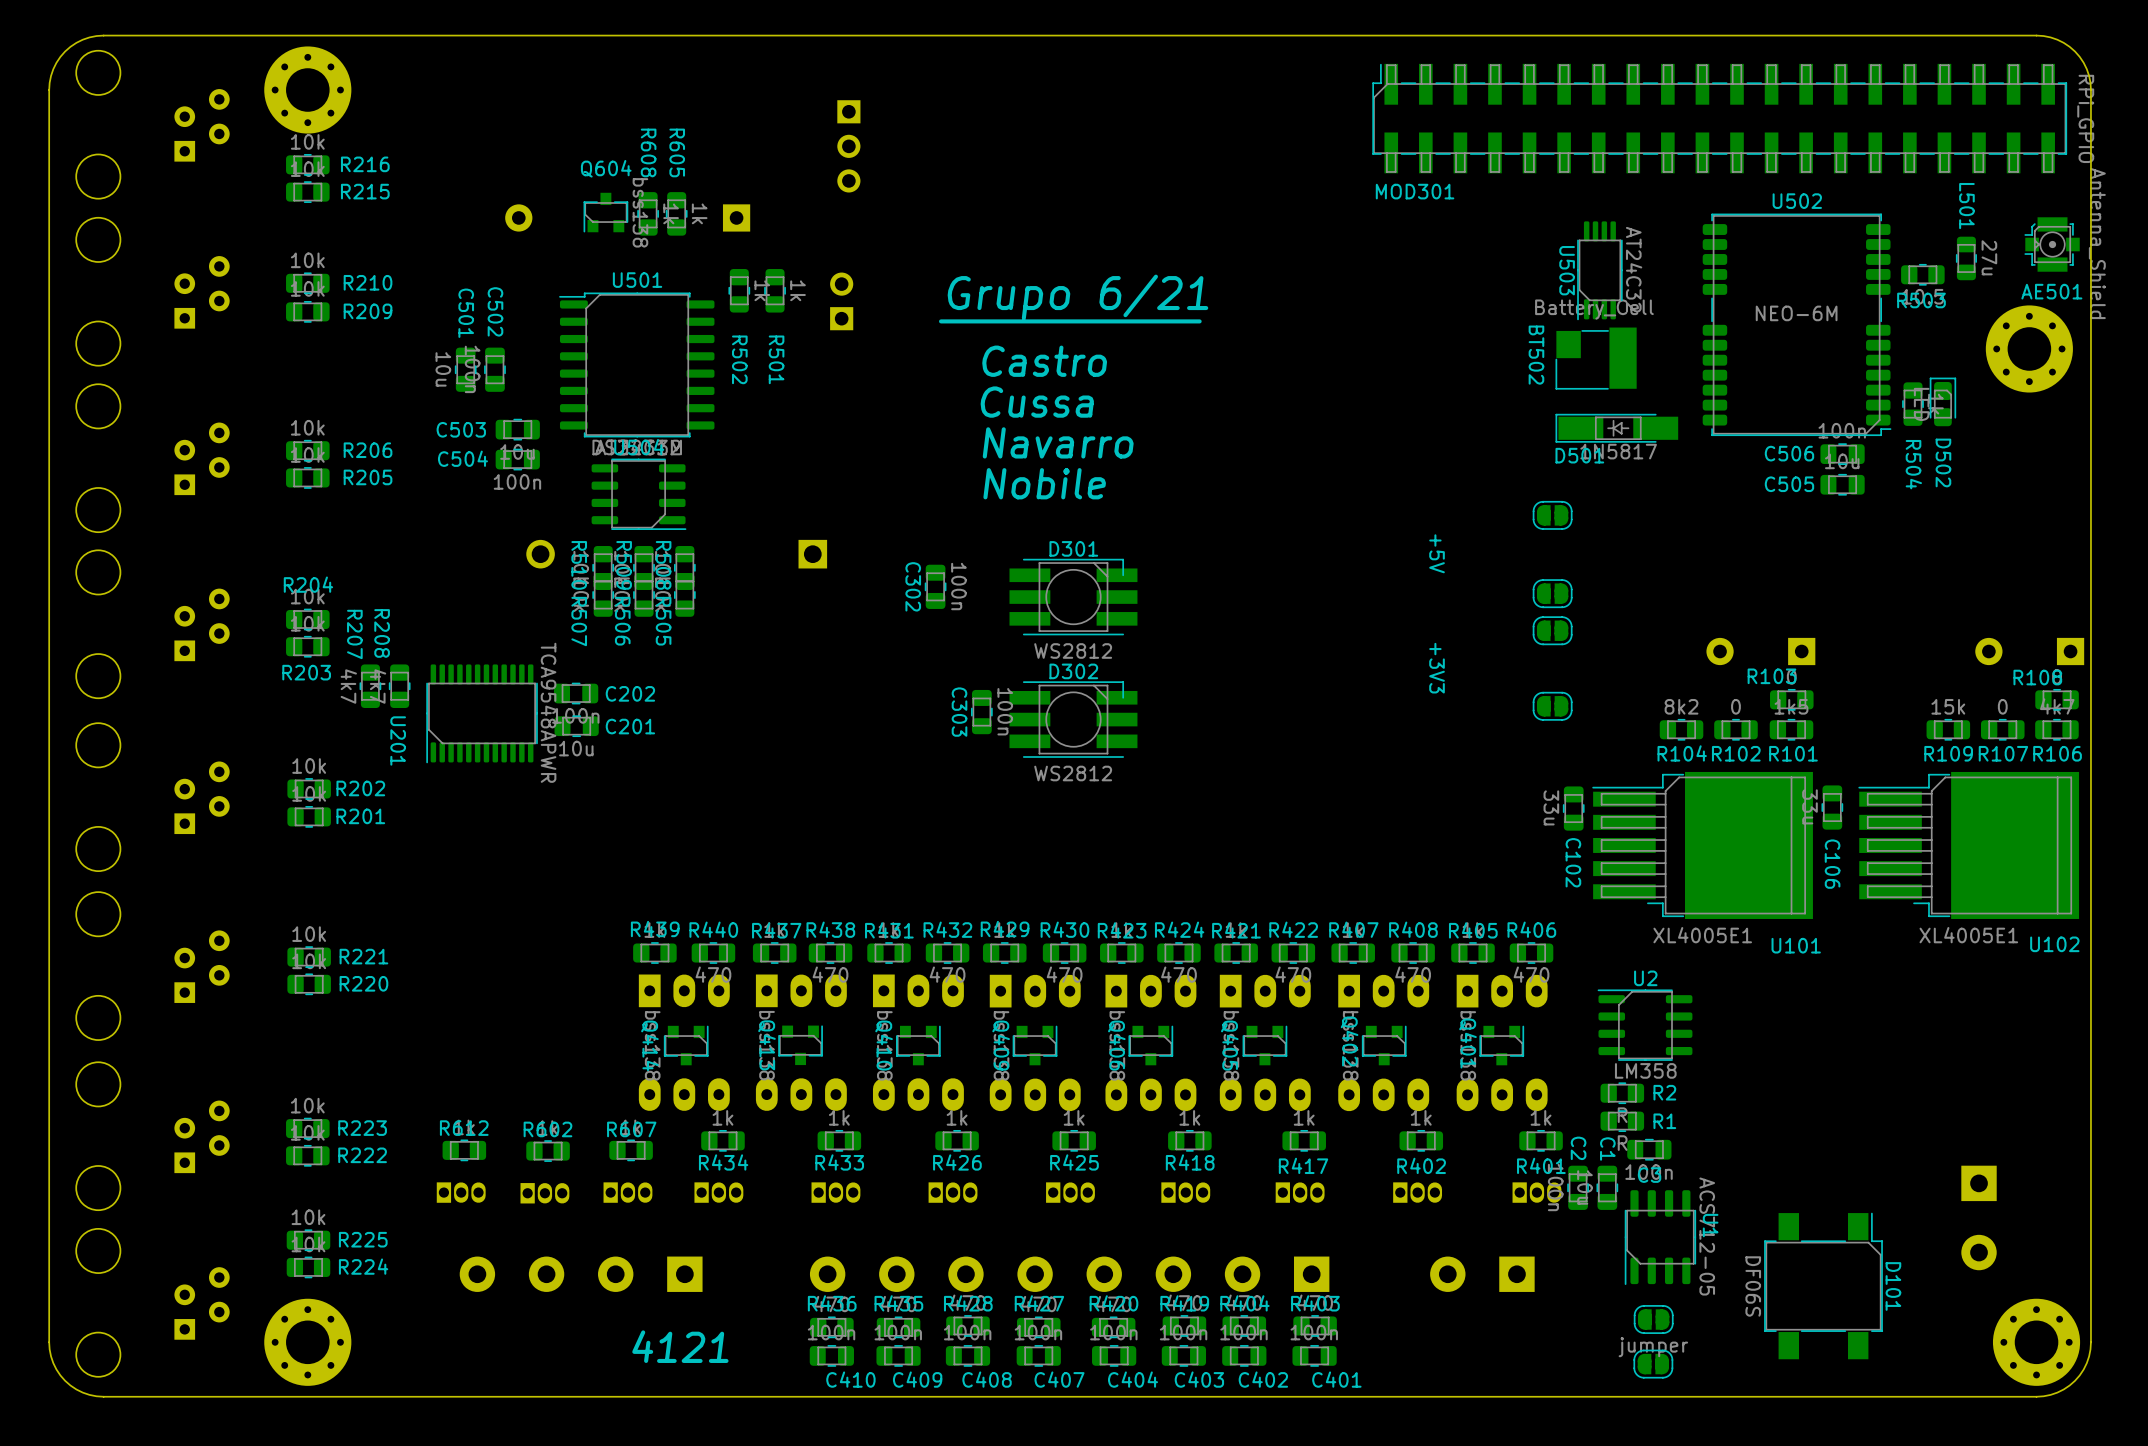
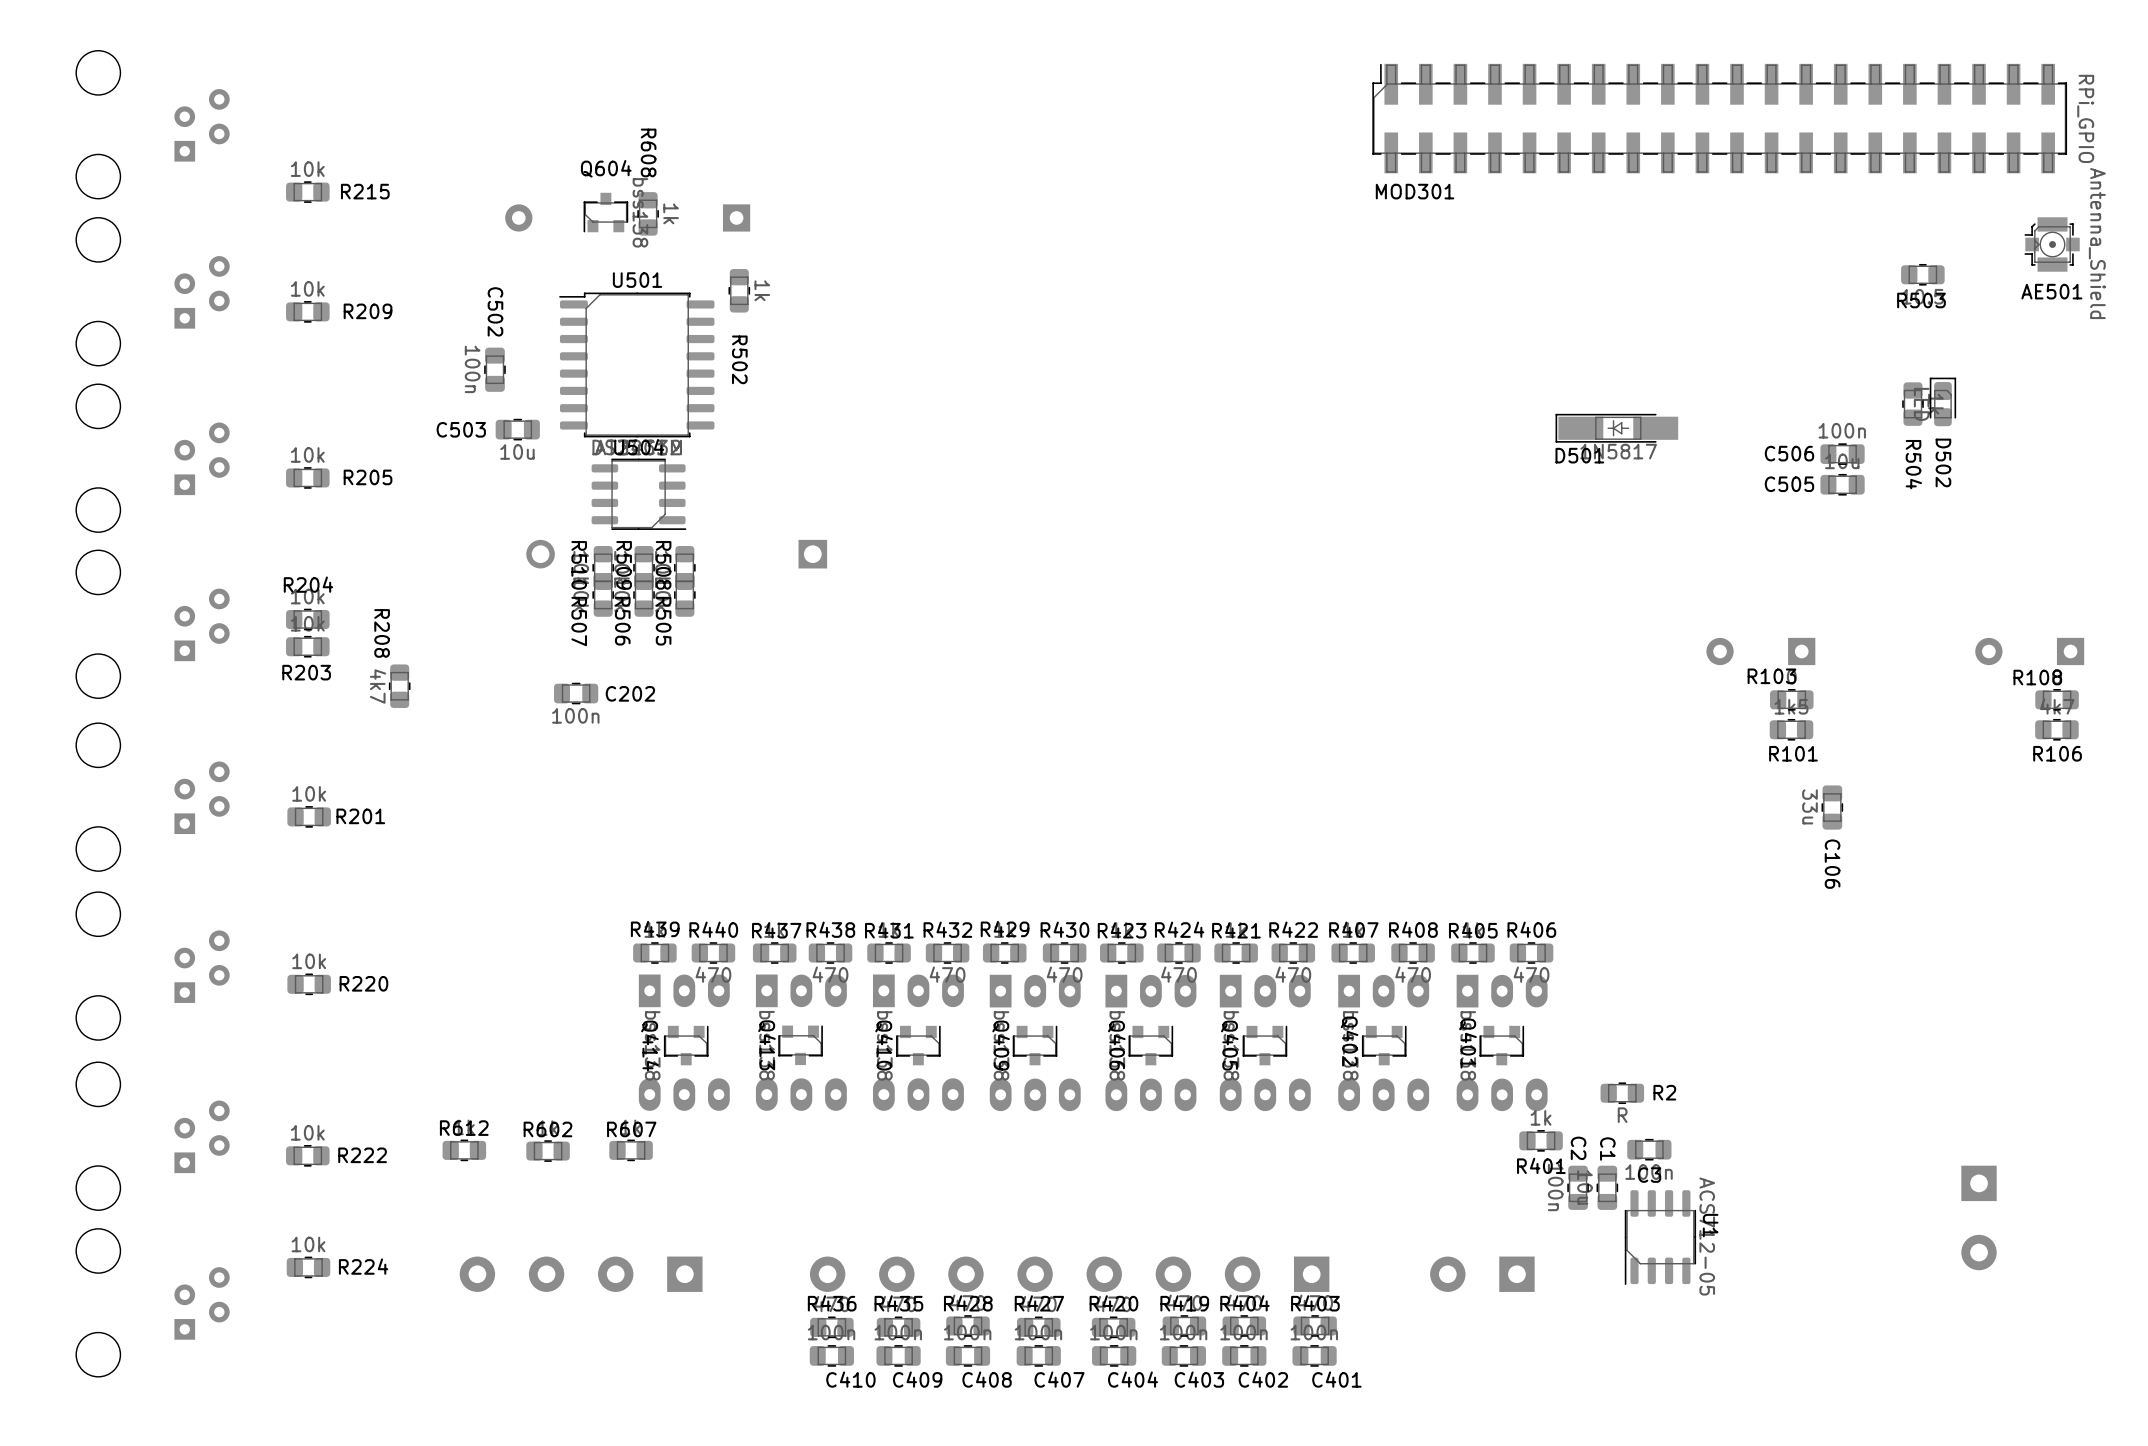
board edge: (2036, 35) (103, 35) (82, 39) (70, 46) (56, 62) (51, 75) (49, 90) (49, 1342) (53, 1363) (60, 1375) (76, 1389) (89, 1394) (103, 1396) (2036, 1396) (2057, 1392) (2069, 1385) (2083, 1369) (2089, 1356) (2090, 1342) (2090, 90) (2086, 69) (2075, 51) (2057, 39) (2036, 35) -> none
part: (307, 90) -> none
part: (848, 146) -> none
R216: 10k (307, 164) -> none
R605: 1k (676, 213) -> none
L501: 27u (1966, 258) -> none
U503: AT24C32 (1599, 270) -> none
R210: 10k (307, 283) -> none
R501: 1k (775, 290) -> none
text: Grupo 6/21 (1077, 297) -> none
part: (841, 301) -> none
line: (1199, 321) (941, 321) -> none
U502: NEO-6M (1797, 324) -> none
part: (2029, 348) -> none
BT502: Battery_Cell (1596, 358) -> none
text: Castro (1044, 361) -> none
C501: 10u (465, 369) -> none
text: Cussa (1037, 402) -> none
text: Navarro (1058, 442) -> none
R206: 10k (307, 450) -> none
C504: 100n (517, 459) -> none
text: Nobile (1044, 483) -> none
part: (1552, 515) -> none
text: +5V (1437, 553) -> none
C302: 100n (935, 586) -> none
part: (1552, 593) -> none
D301: WS2812 (1073, 597) -> none
part: (1552, 630) -> none
text: +3V3 (1437, 668) -> none
R207: 4k7 (370, 686) -> none
part: (1552, 706) -> none
C303: 100n (981, 712) -> none
U201: TCA9548APWR (482, 713) -> none
D302: WS2812 (1073, 719) -> none
C201: 10u (576, 726) -> none
R104: 8k2 (1681, 729) -> none
R102: 0 (1735, 729) -> none
R109: 15k (1948, 729) -> none
R107: 0 (2002, 729) -> none
R202: 10k (309, 788) -> none
C102: 33u (1573, 808) -> none
U101: XL4005E1 (1702, 845) -> none
U102: XL4005E1 (1968, 845) -> none
R221: 10k (309, 957) -> none
U2: LM358 (1645, 1025) -> none
R1: R (1622, 1121) -> none
R223: 10k (307, 1128) -> none
R434: 1k (722, 1140) -> none
R433: 1k (839, 1140) -> none
R426: 1k (957, 1140) -> none
R425: 1k (1074, 1140) -> none
R418: 1k (1189, 1140) -> none
R417: 1k (1304, 1140) -> none
R402: 1k (1421, 1140) -> none
part: (461, 1192) -> none
part: (627, 1192) -> none
part: (718, 1192) -> none
part: (835, 1192) -> none
part: (953, 1192) -> none
part: (1070, 1192) -> none
part: (1185, 1192) -> none
part: (1300, 1192) -> none
part: (1417, 1192) -> none
part: (1536, 1192) -> none
part: (544, 1193) -> none
R225: 10k (308, 1240) -> none
D101: DF06S (1823, 1285) -> none
part: jumper (1653, 1319) -> none
part: (307, 1342) -> none
part: (2036, 1342) -> none
text: 4121 (680, 1346) -> none
part: (1653, 1364) -> none

